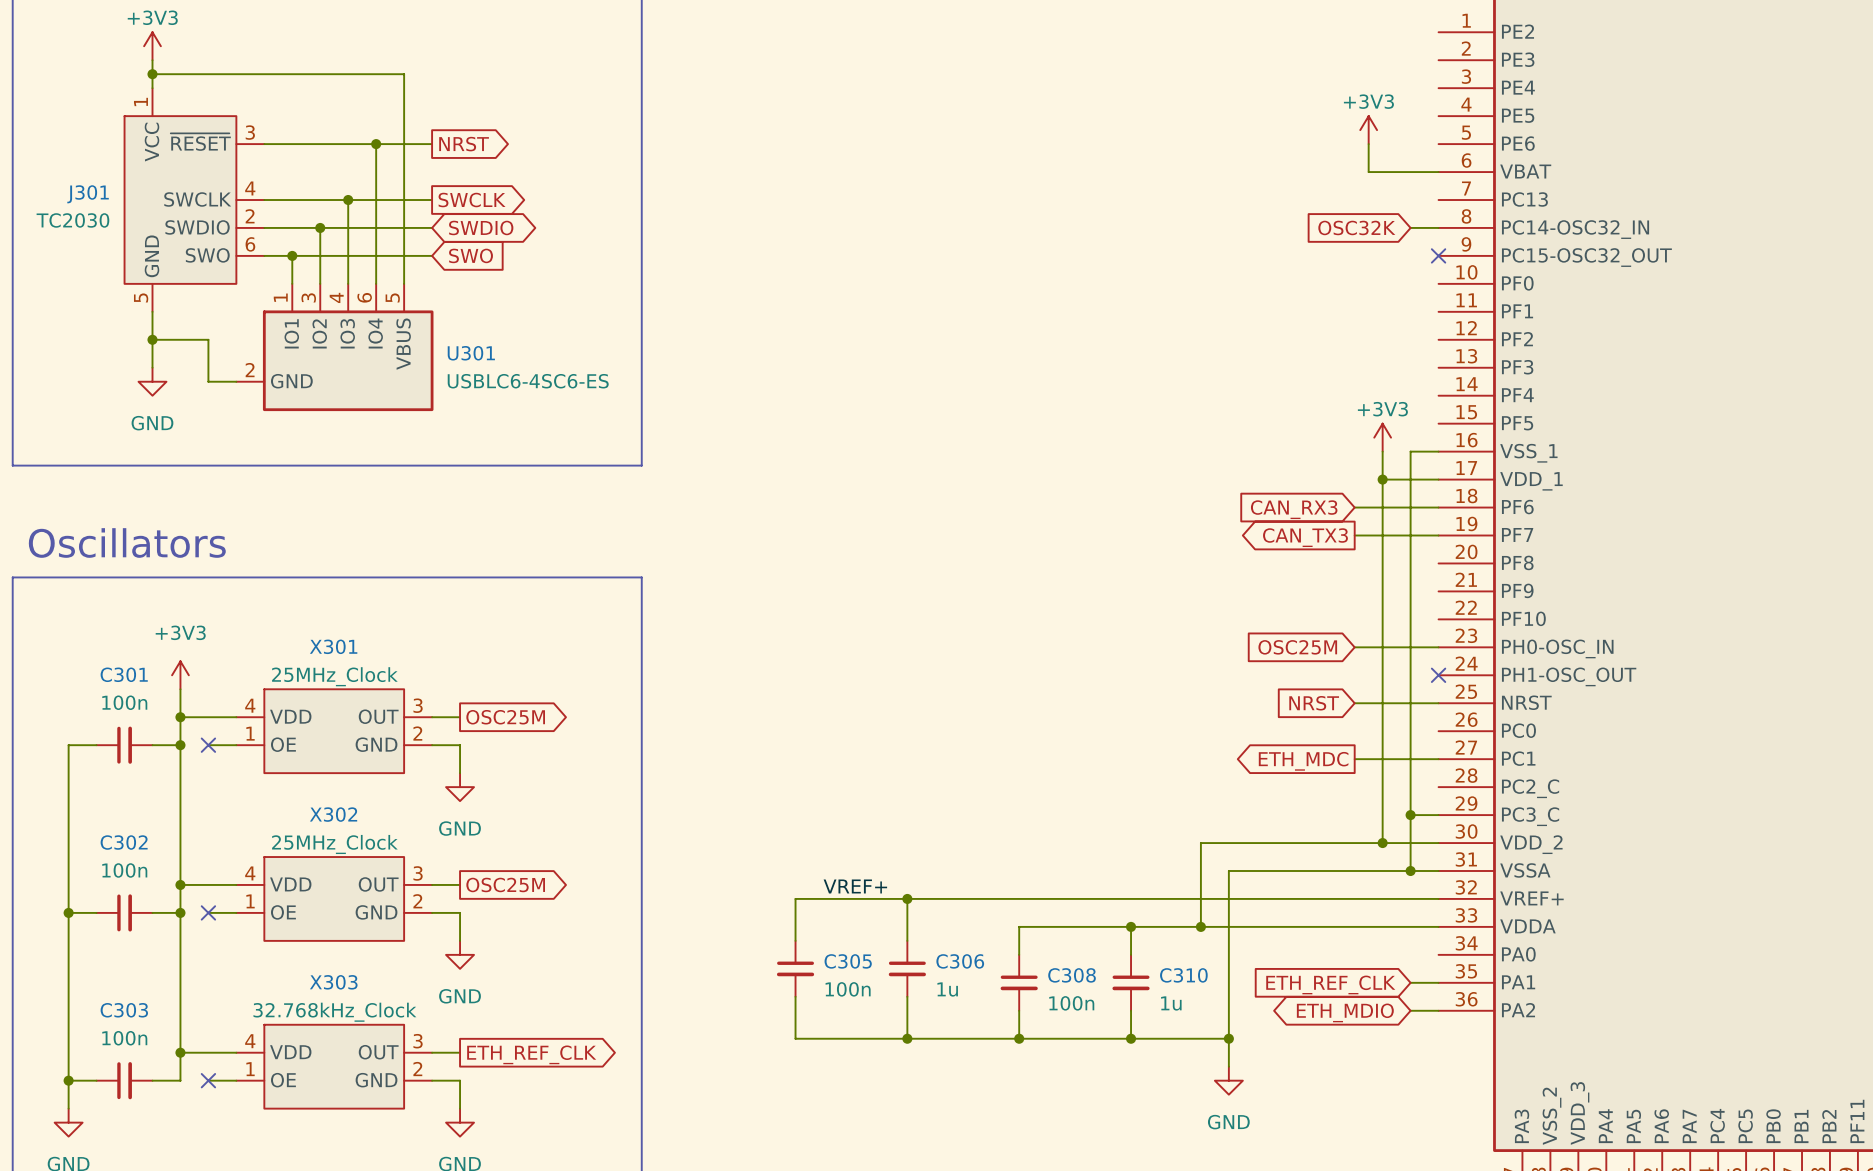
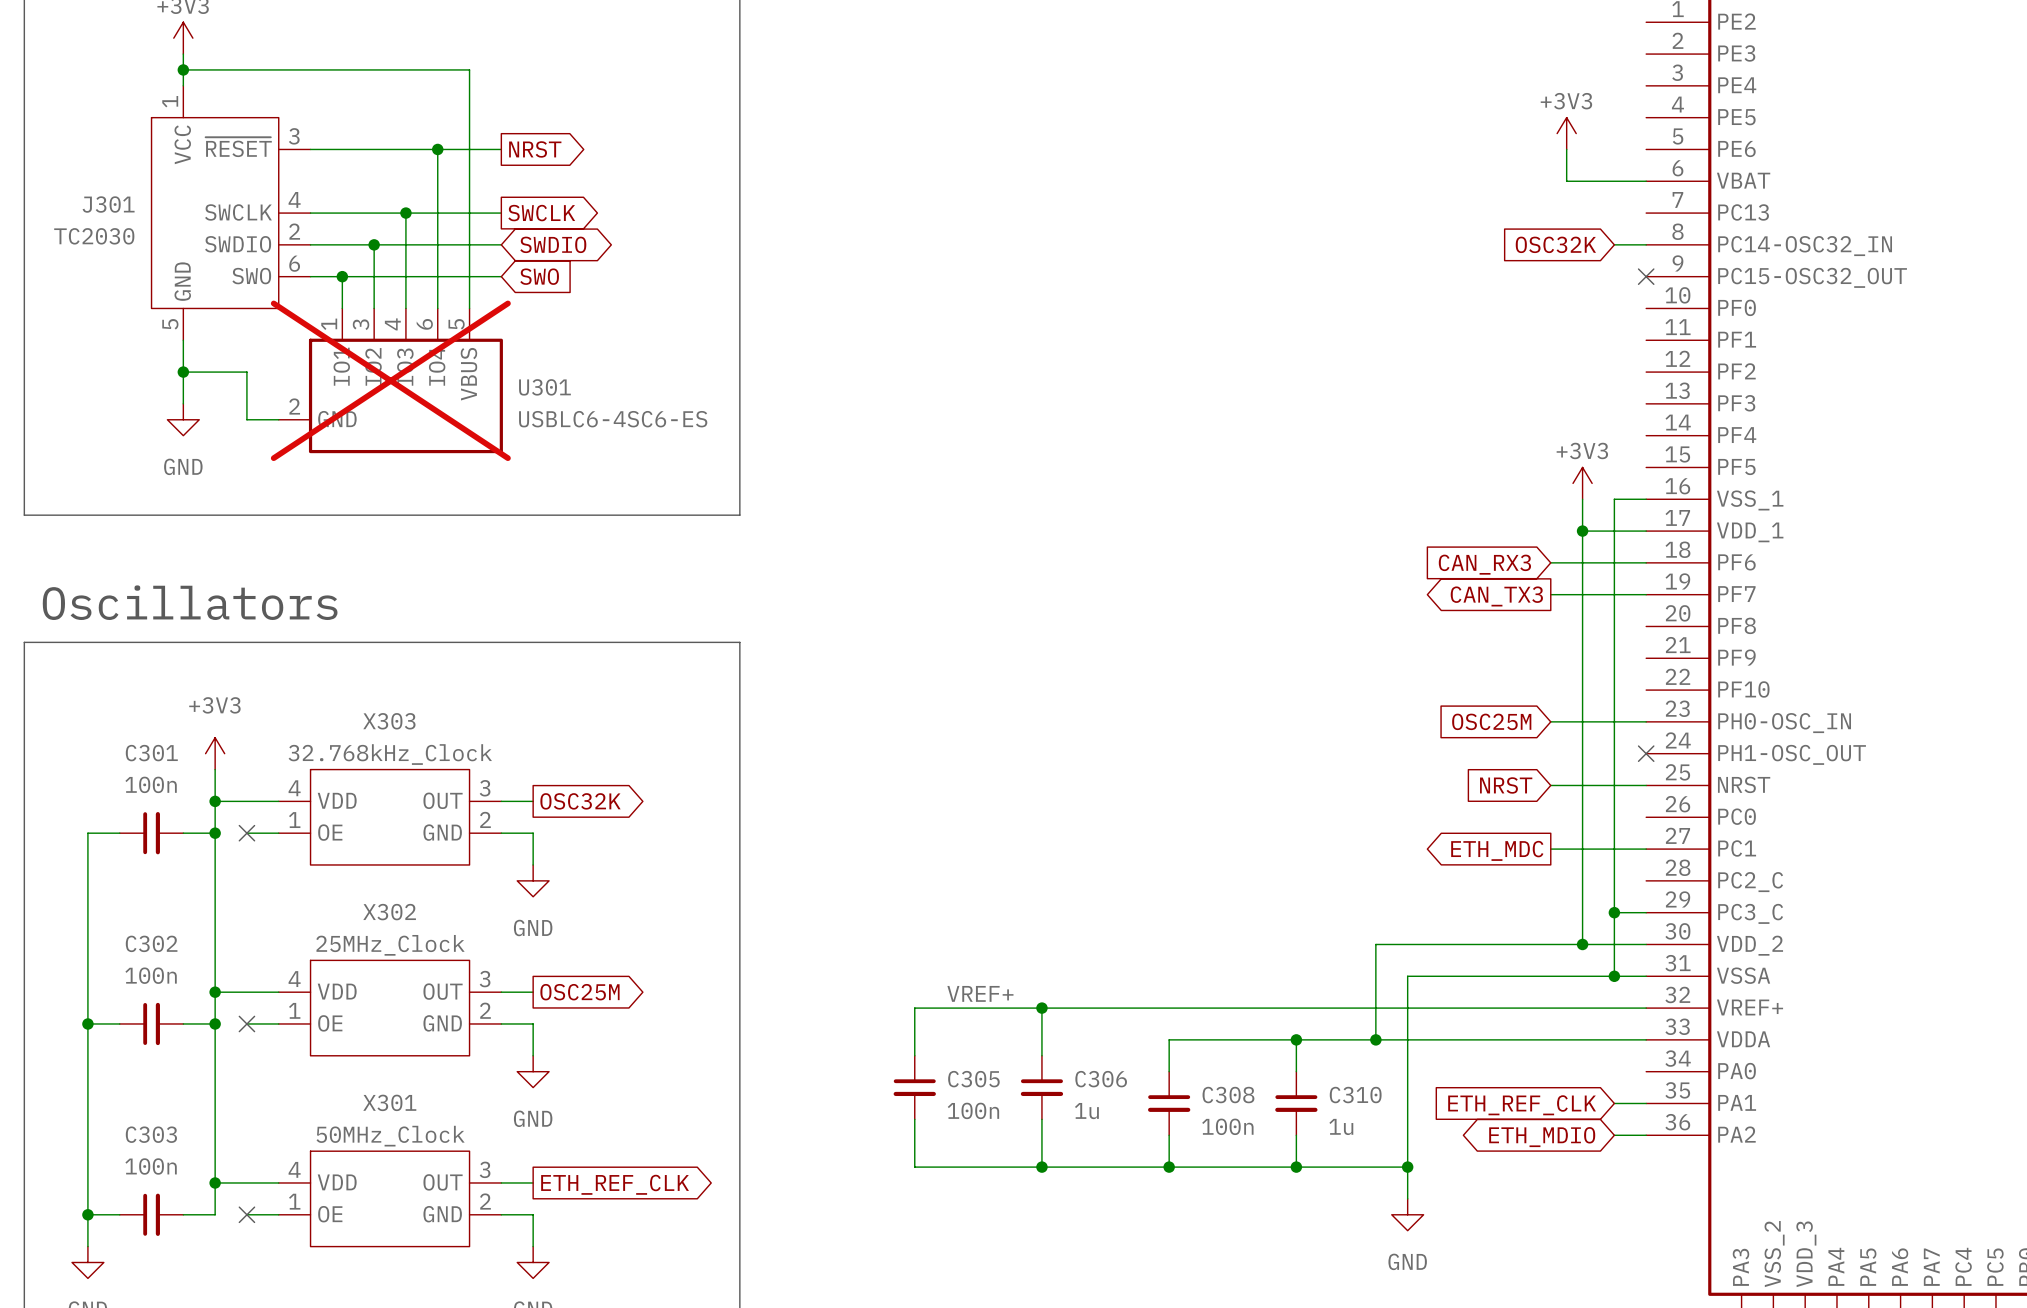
U301 do-not-place cross: none -> (390, 380)
X301 name: X301 (333, 646) -> X303 (389, 721)
X301 value: 25MHz_Clock (334, 676) -> 32.768kHz_Clock (390, 754)
global label: OSC25M (505, 717) -> OSC32K (580, 801)
X303 name: X303 (333, 982) -> X301 (389, 1102)
X303 value: 32.768kHz_Clock (334, 1012) -> 50MHz_Clock (390, 1136)

